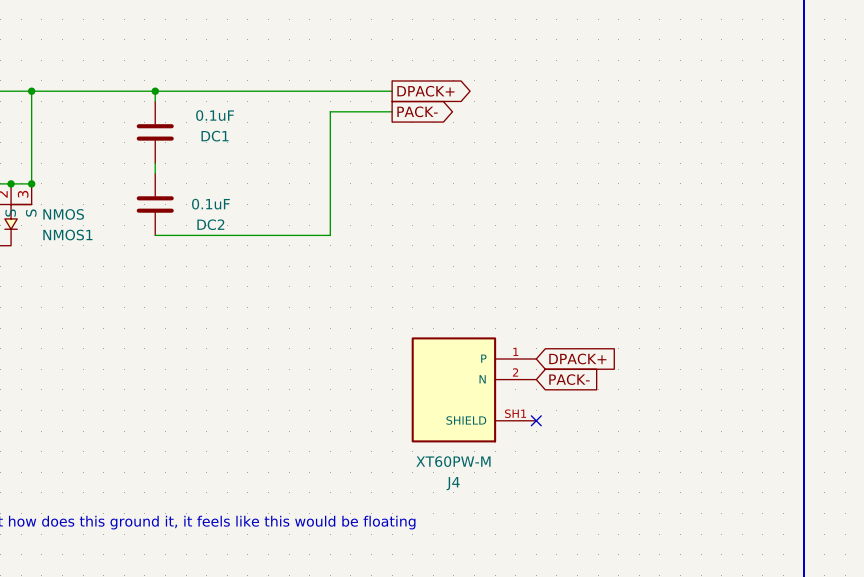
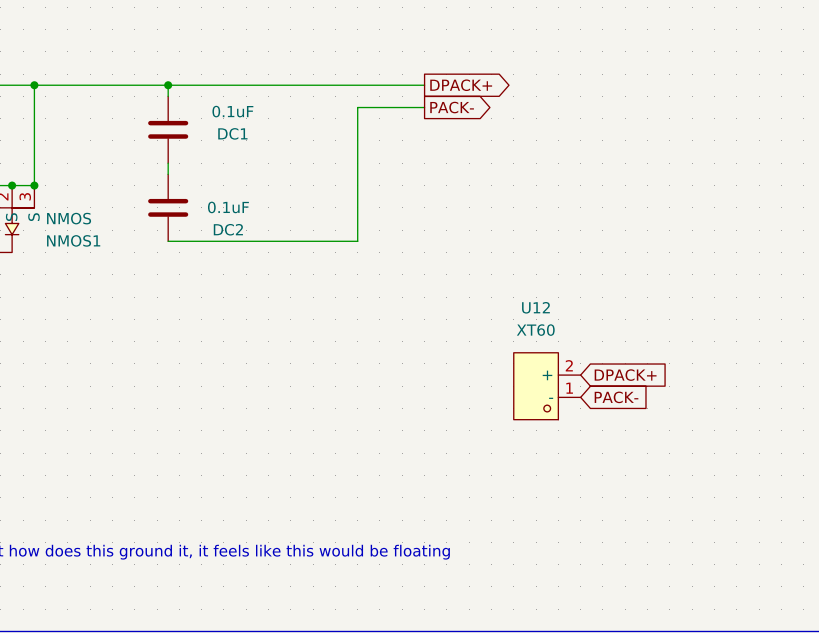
U12: none -> XT60 (547, 386)
J4: XT60PW-M (473, 389) -> none
no-connect mark: (536, 420) -> none

